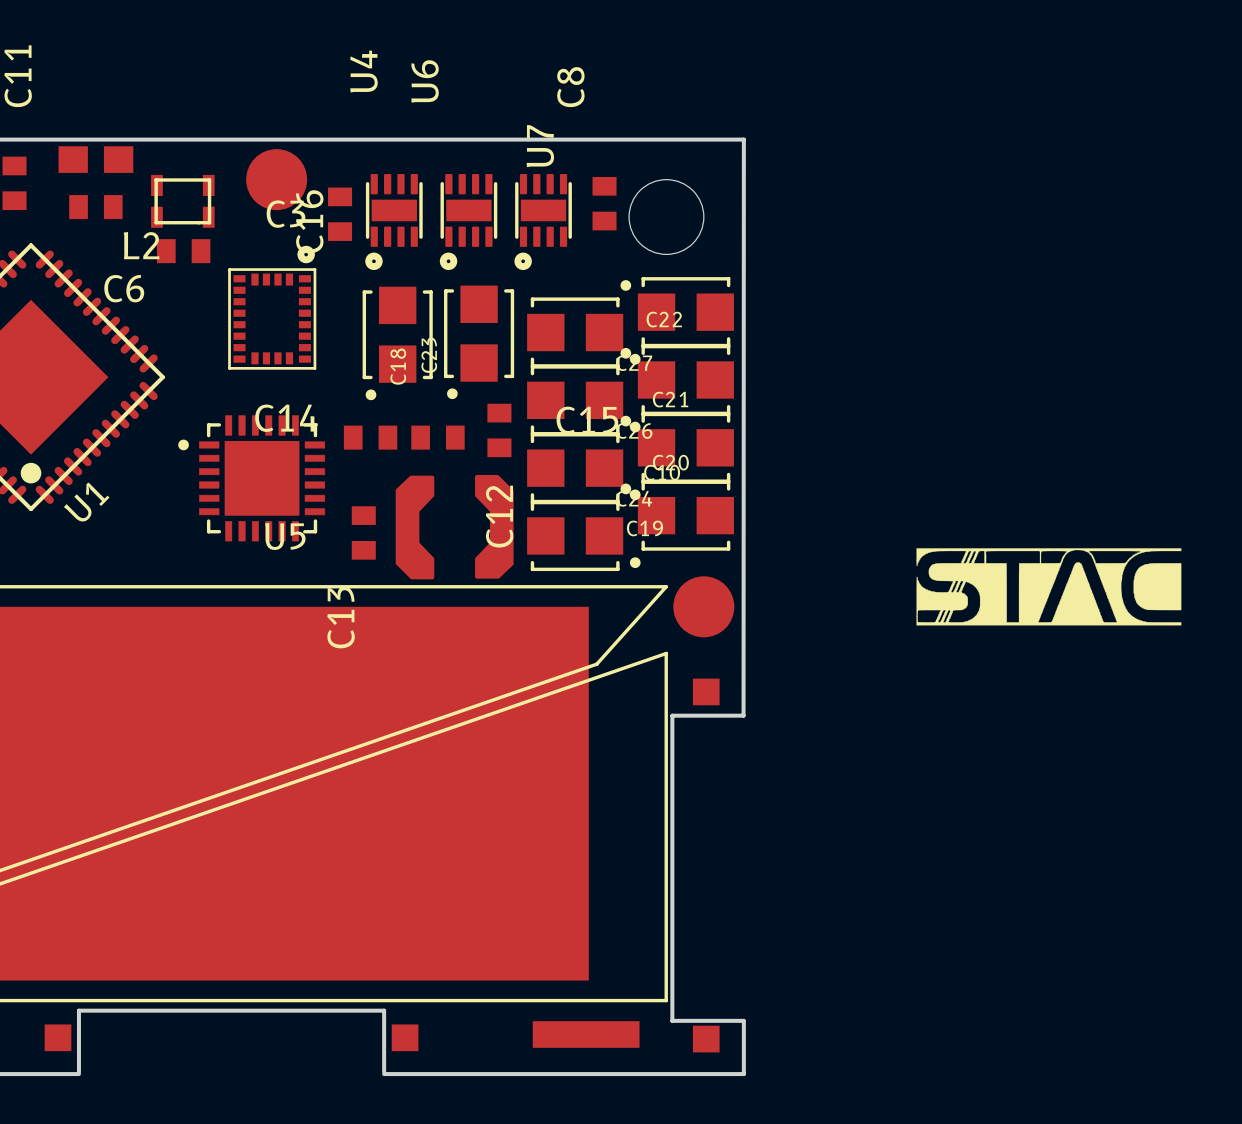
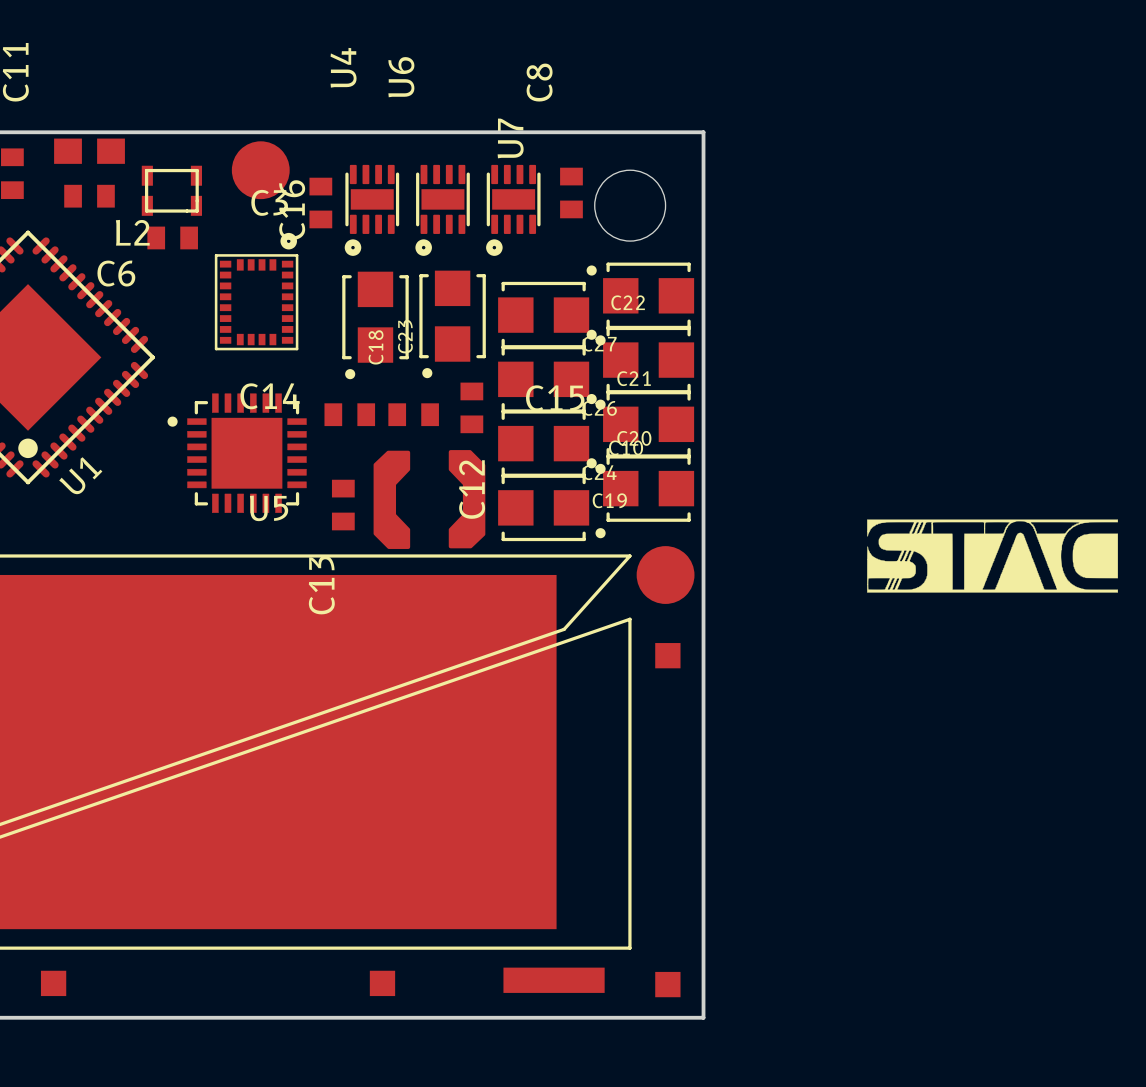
board edge: (743, 139) (743, 715) (672, 715) (672, 1020) (743, 1020) -> (703, 132) (703, 967)
board edge: (78, 1071) (78, 1010) (384, 1010) (384, 1071) -> none
board edge: none -> (73, 1017) (362, 1017)

